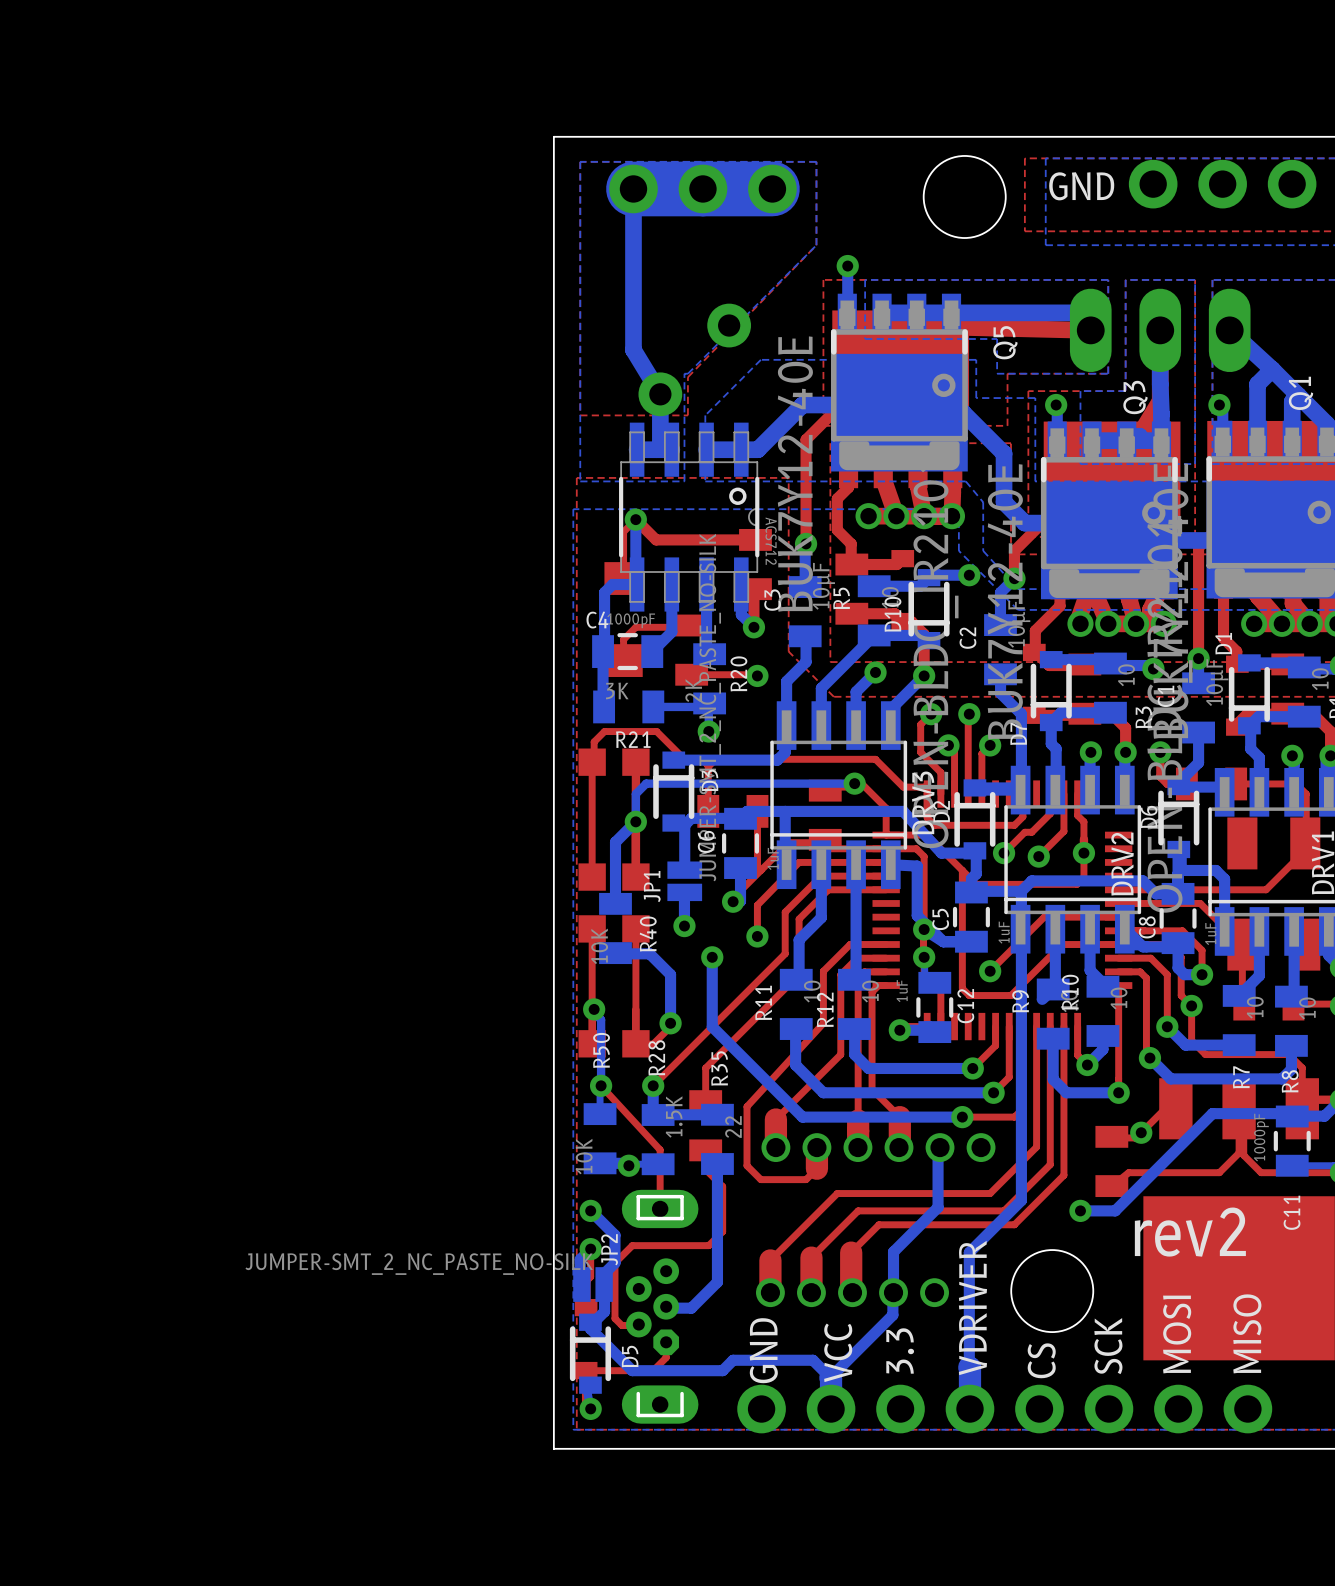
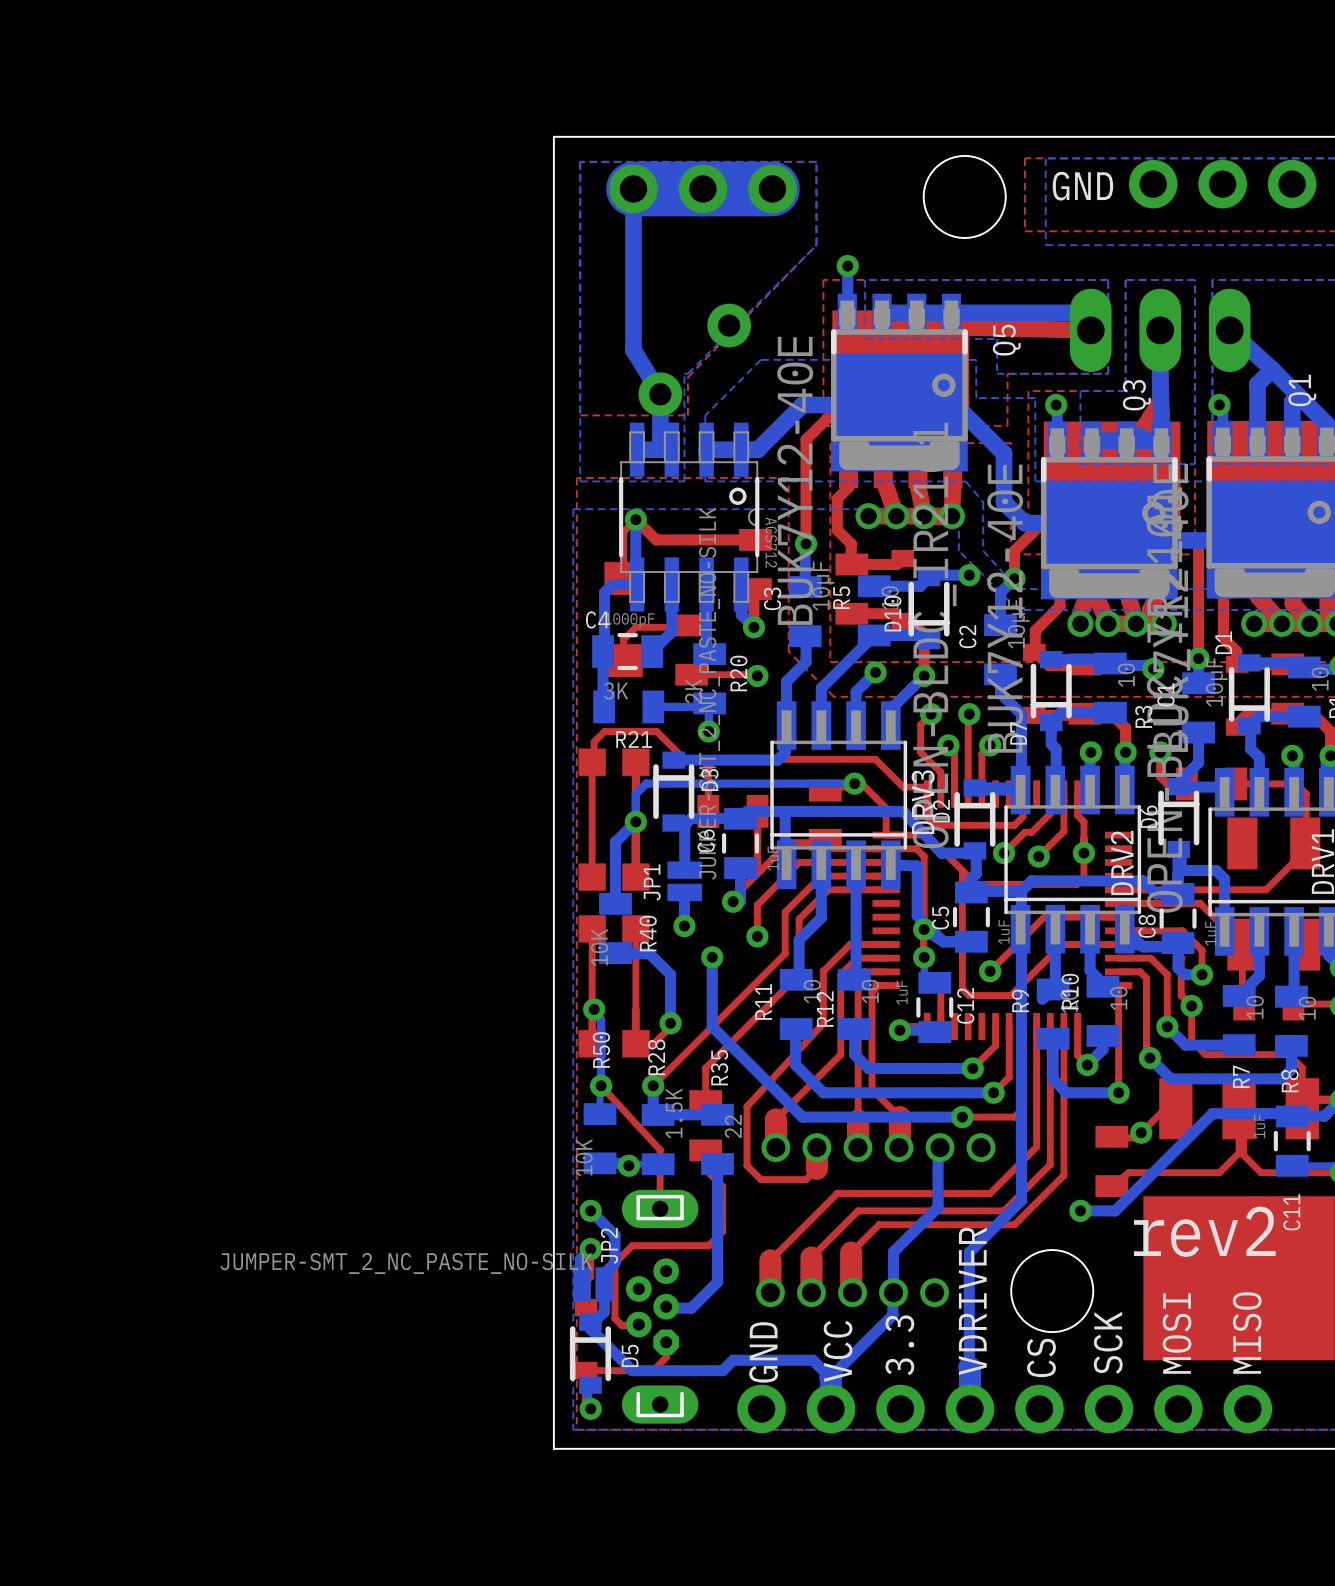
C11 value: 1000pF (1261, 1137) -> 1uF (1259, 1126)

